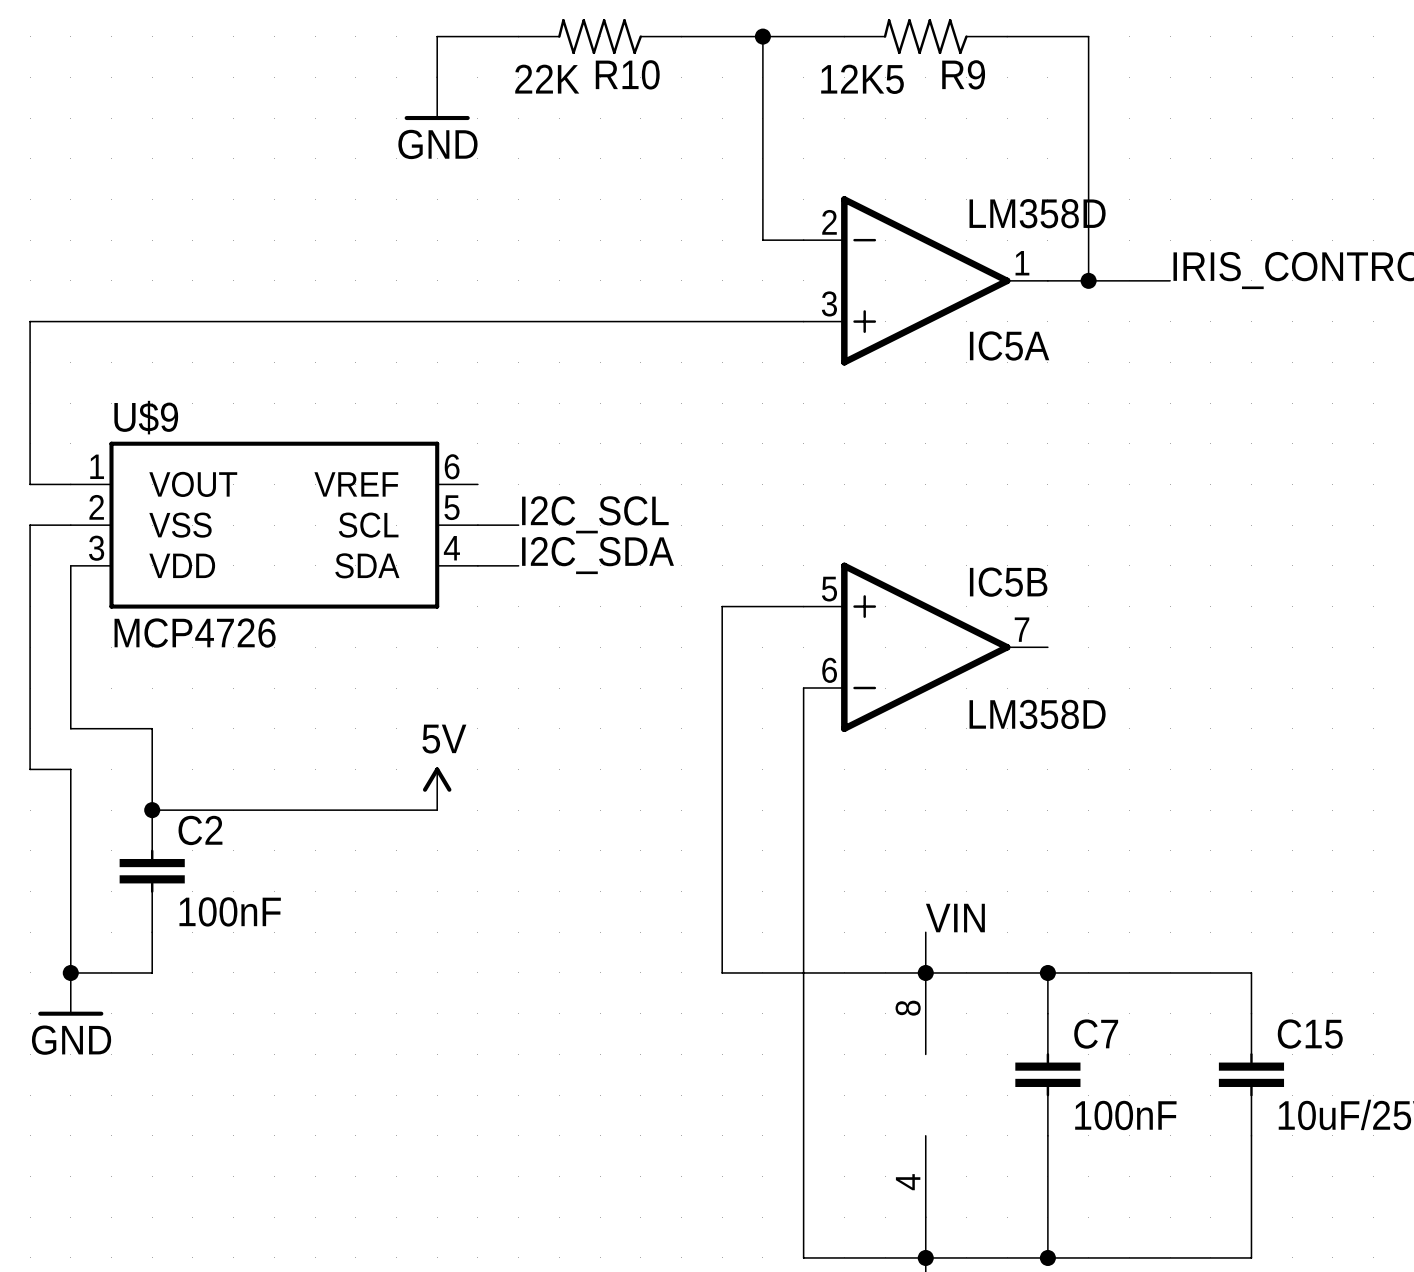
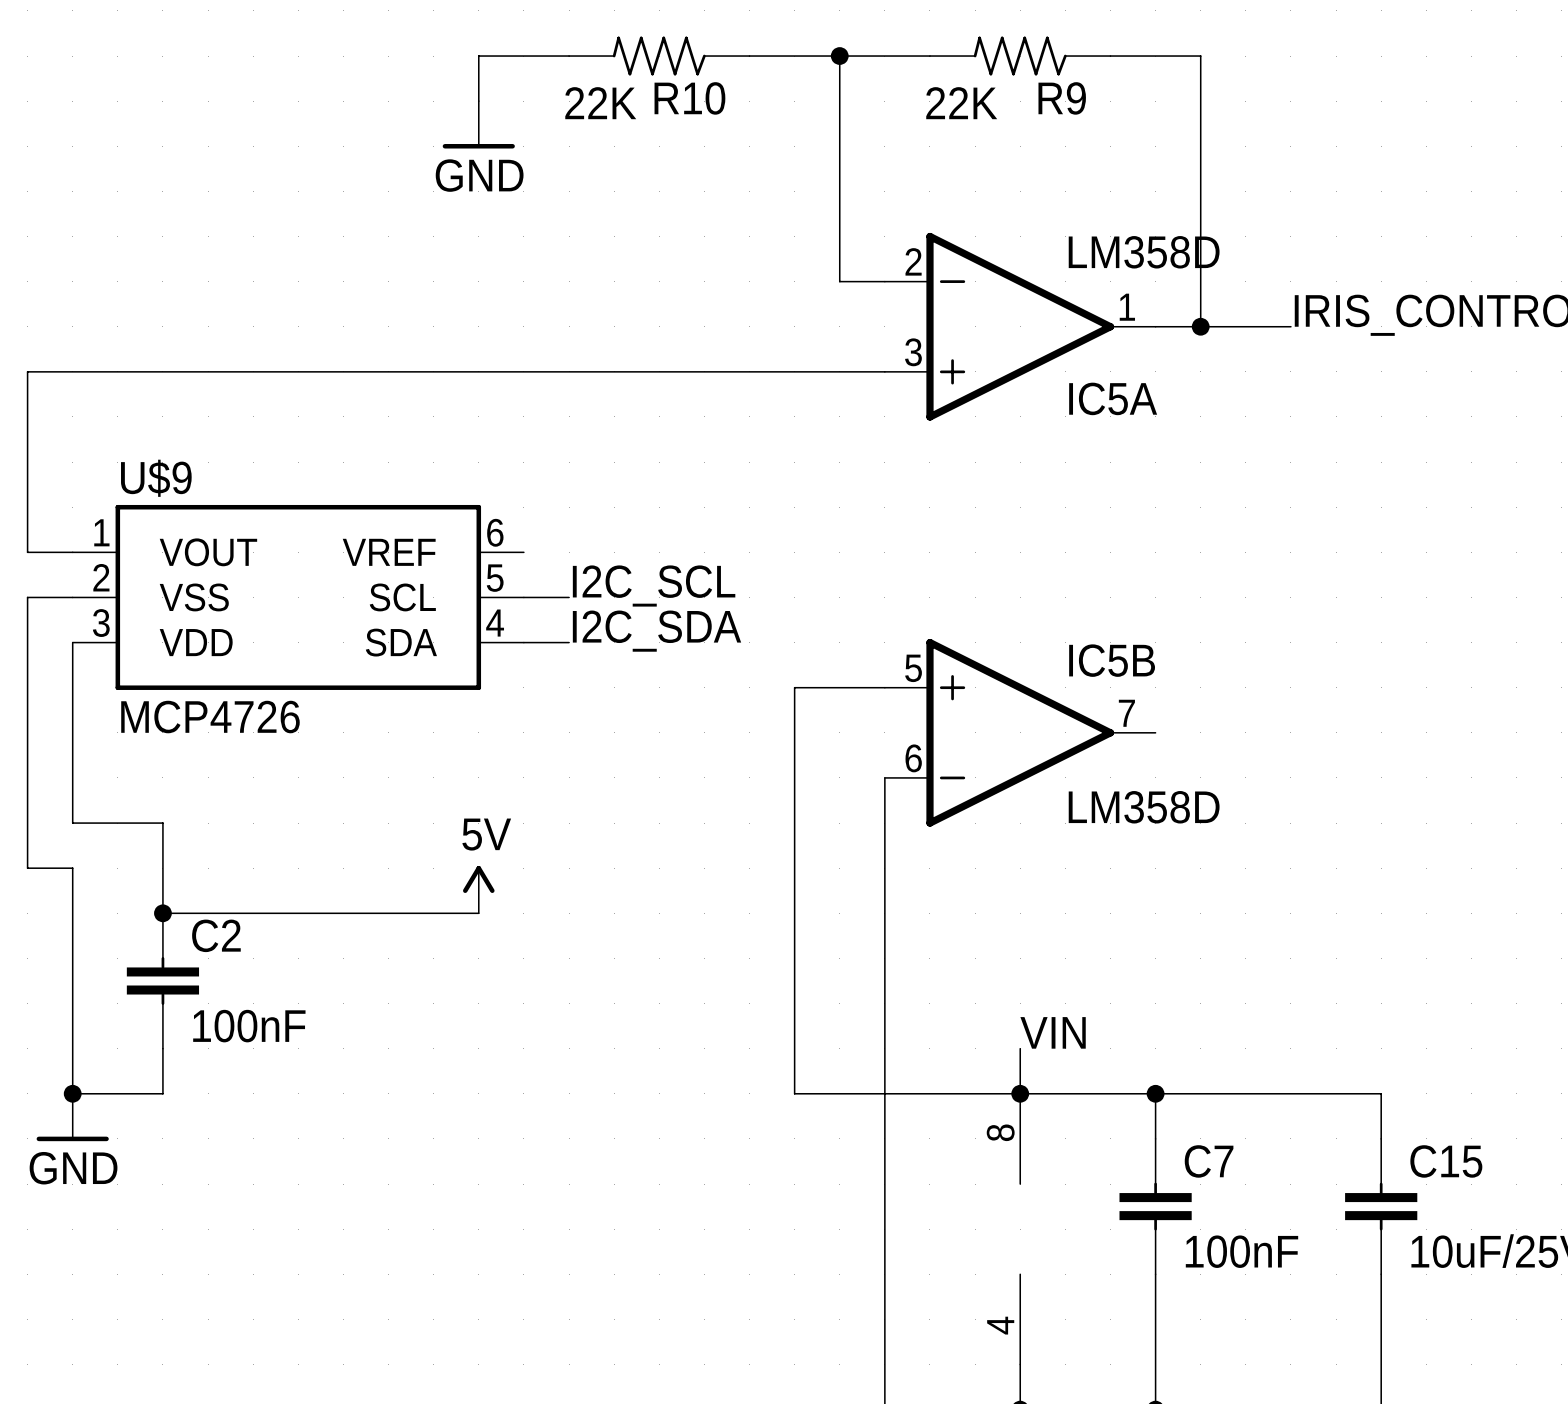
R9 value: 12K5 (862, 79) -> 22K (961, 103)

